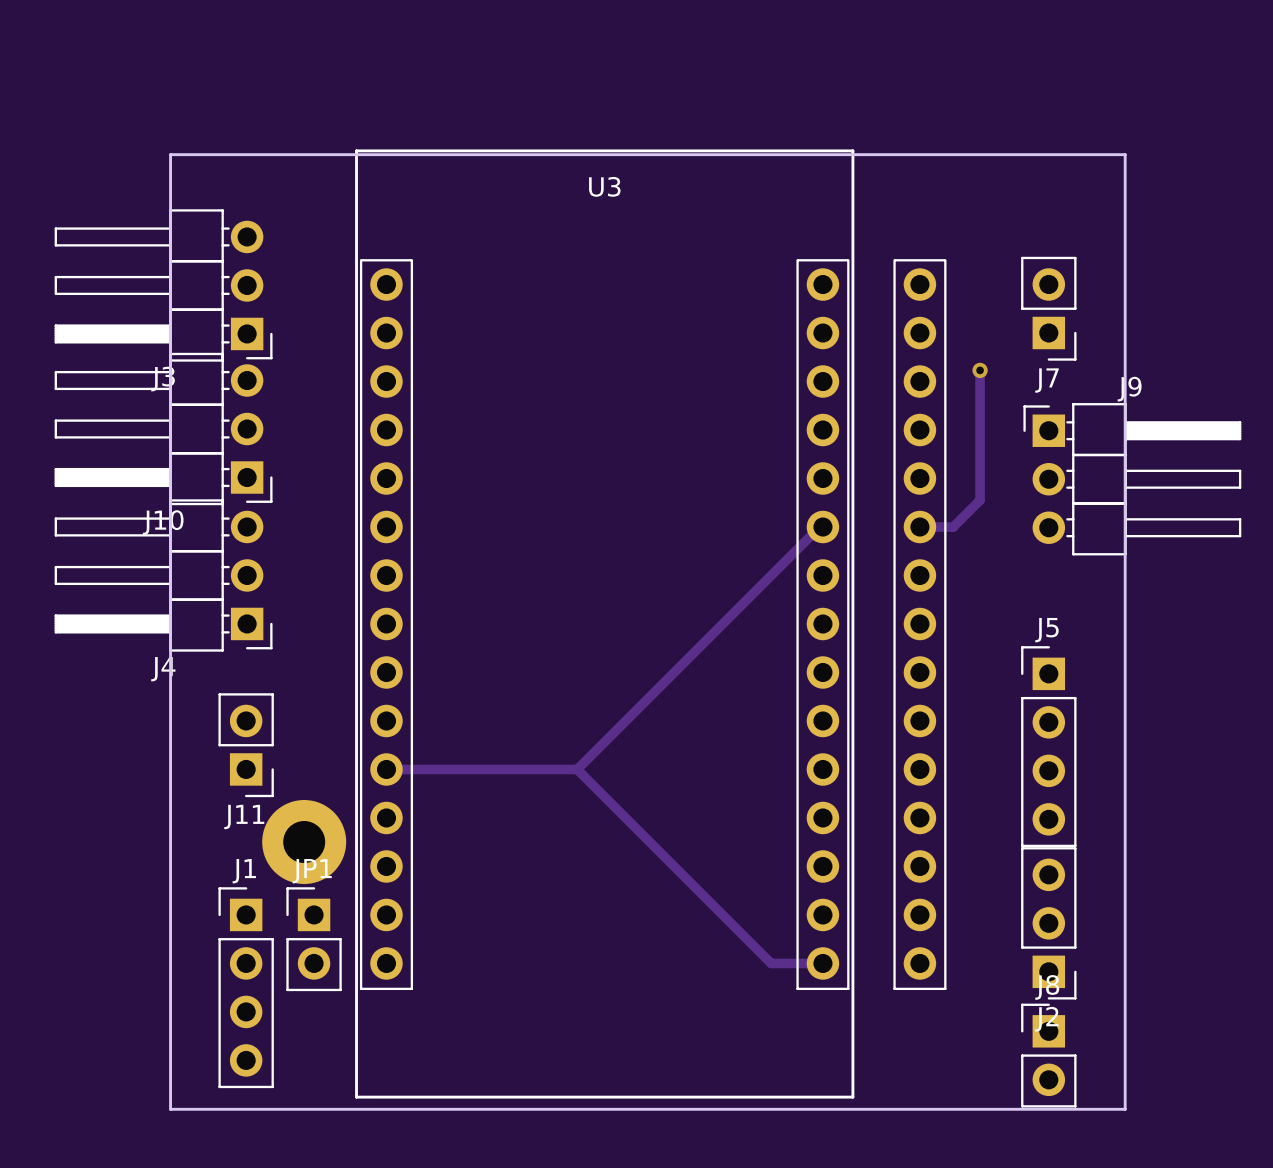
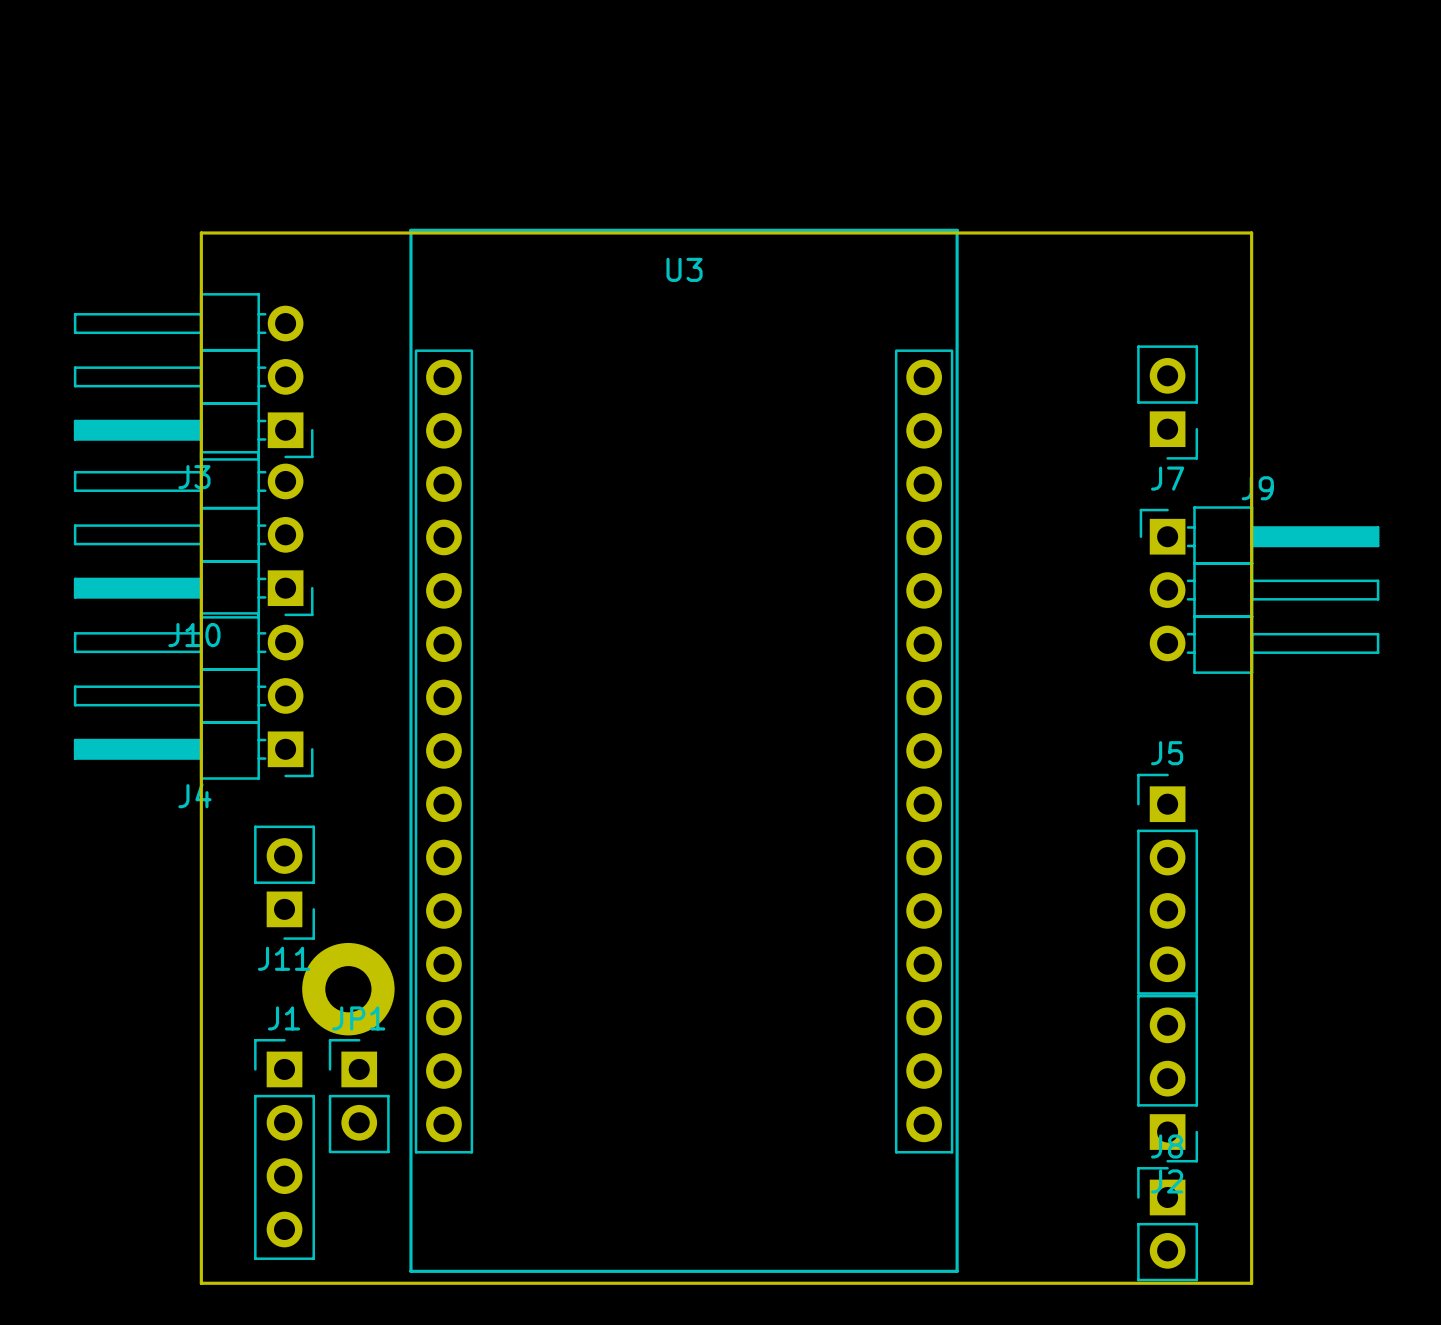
U3 footprint: [355, 41, 947, 1099] -> [409, 110, 1059, 1273]
track: (980, 370) (980, 500) (953, 527) (919, 527) -> none
via: (980, 370) -> none
track: (822, 527) (819, 527) (577, 769) -> none
track: (577, 769) (386, 769) -> none
track: (577, 769) (771, 963) (822, 963) -> none

